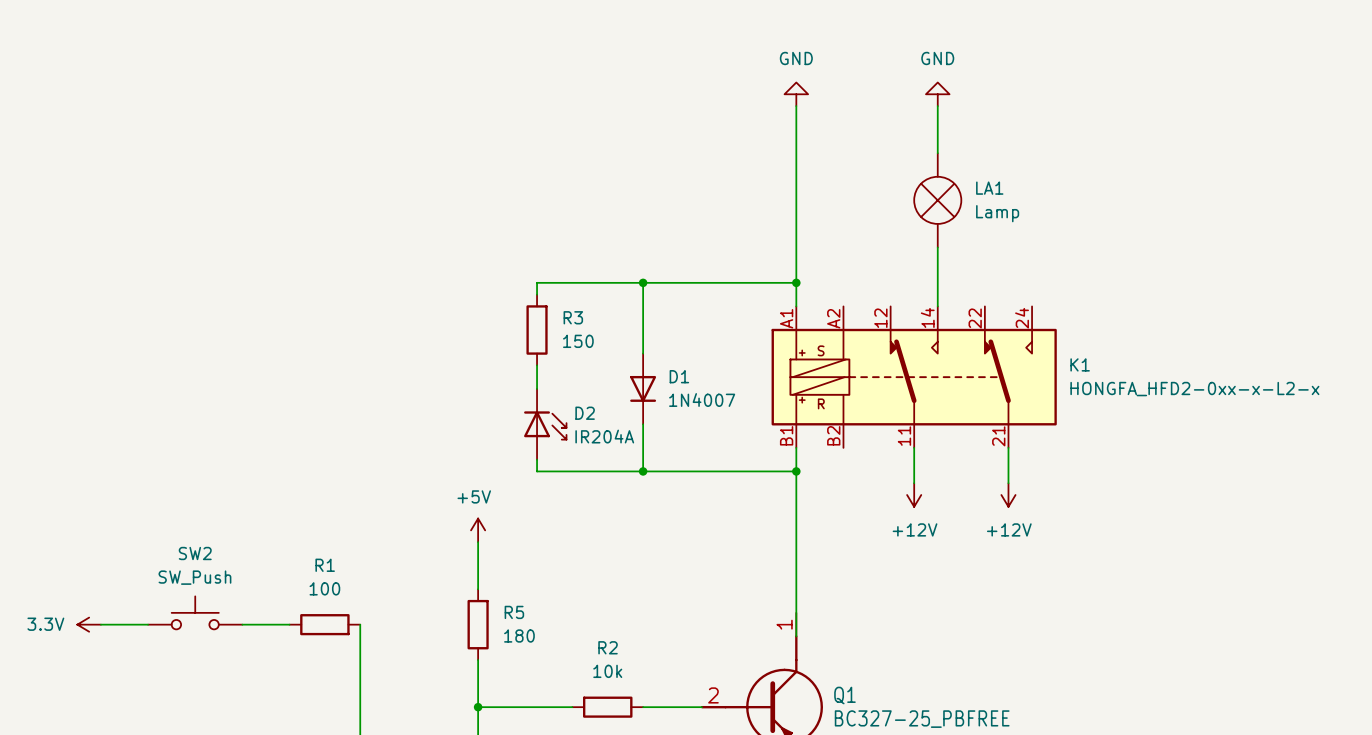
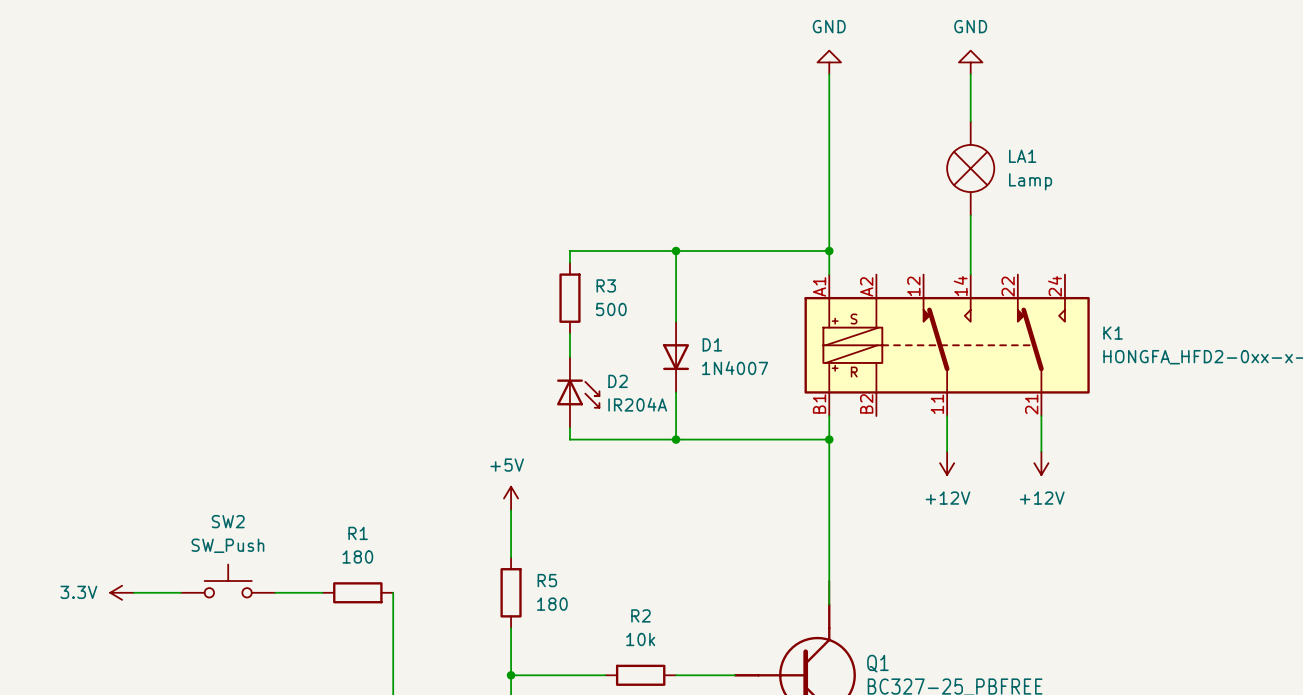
R3 value: 150 (578, 341) -> 500 (611, 309)
R1 value: 100 (324, 588) -> 180 (357, 557)
Q1 pin number: 1 (784, 624) -> none
Q1 pin number: 2 (713, 695) -> none

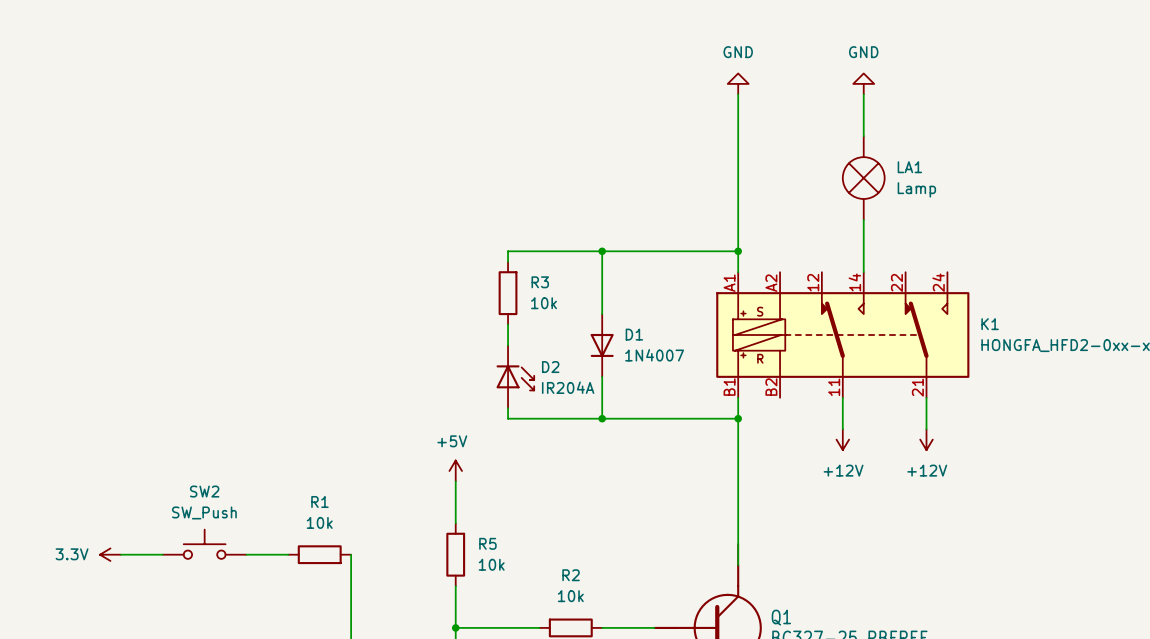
R3 value: 500 (611, 309) -> 10k (543, 303)
R1 value: 180 (357, 557) -> 10k (319, 522)
R5 value: 180 (552, 604) -> 10k (491, 564)

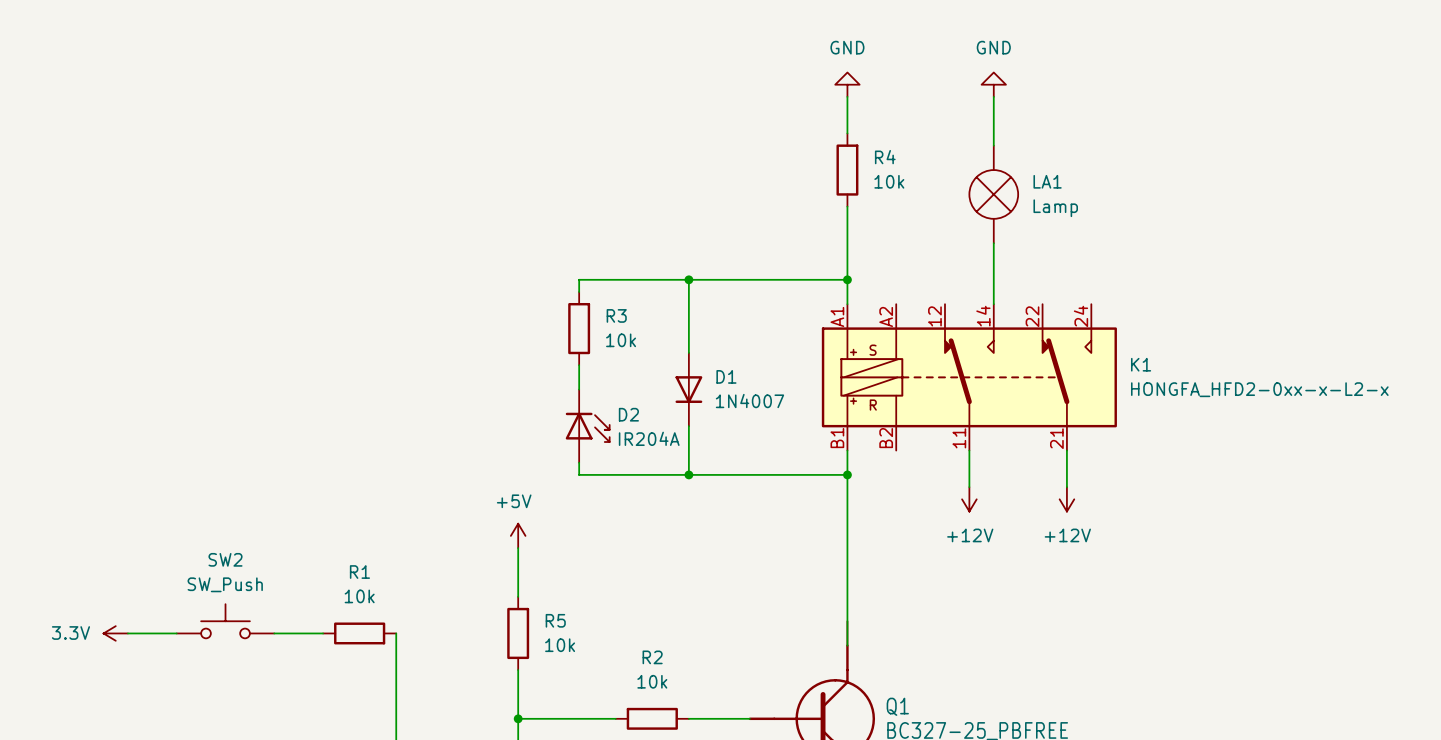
wire: (738, 125) (738, 188) -> none
R4: none -> 10k (847, 170)

